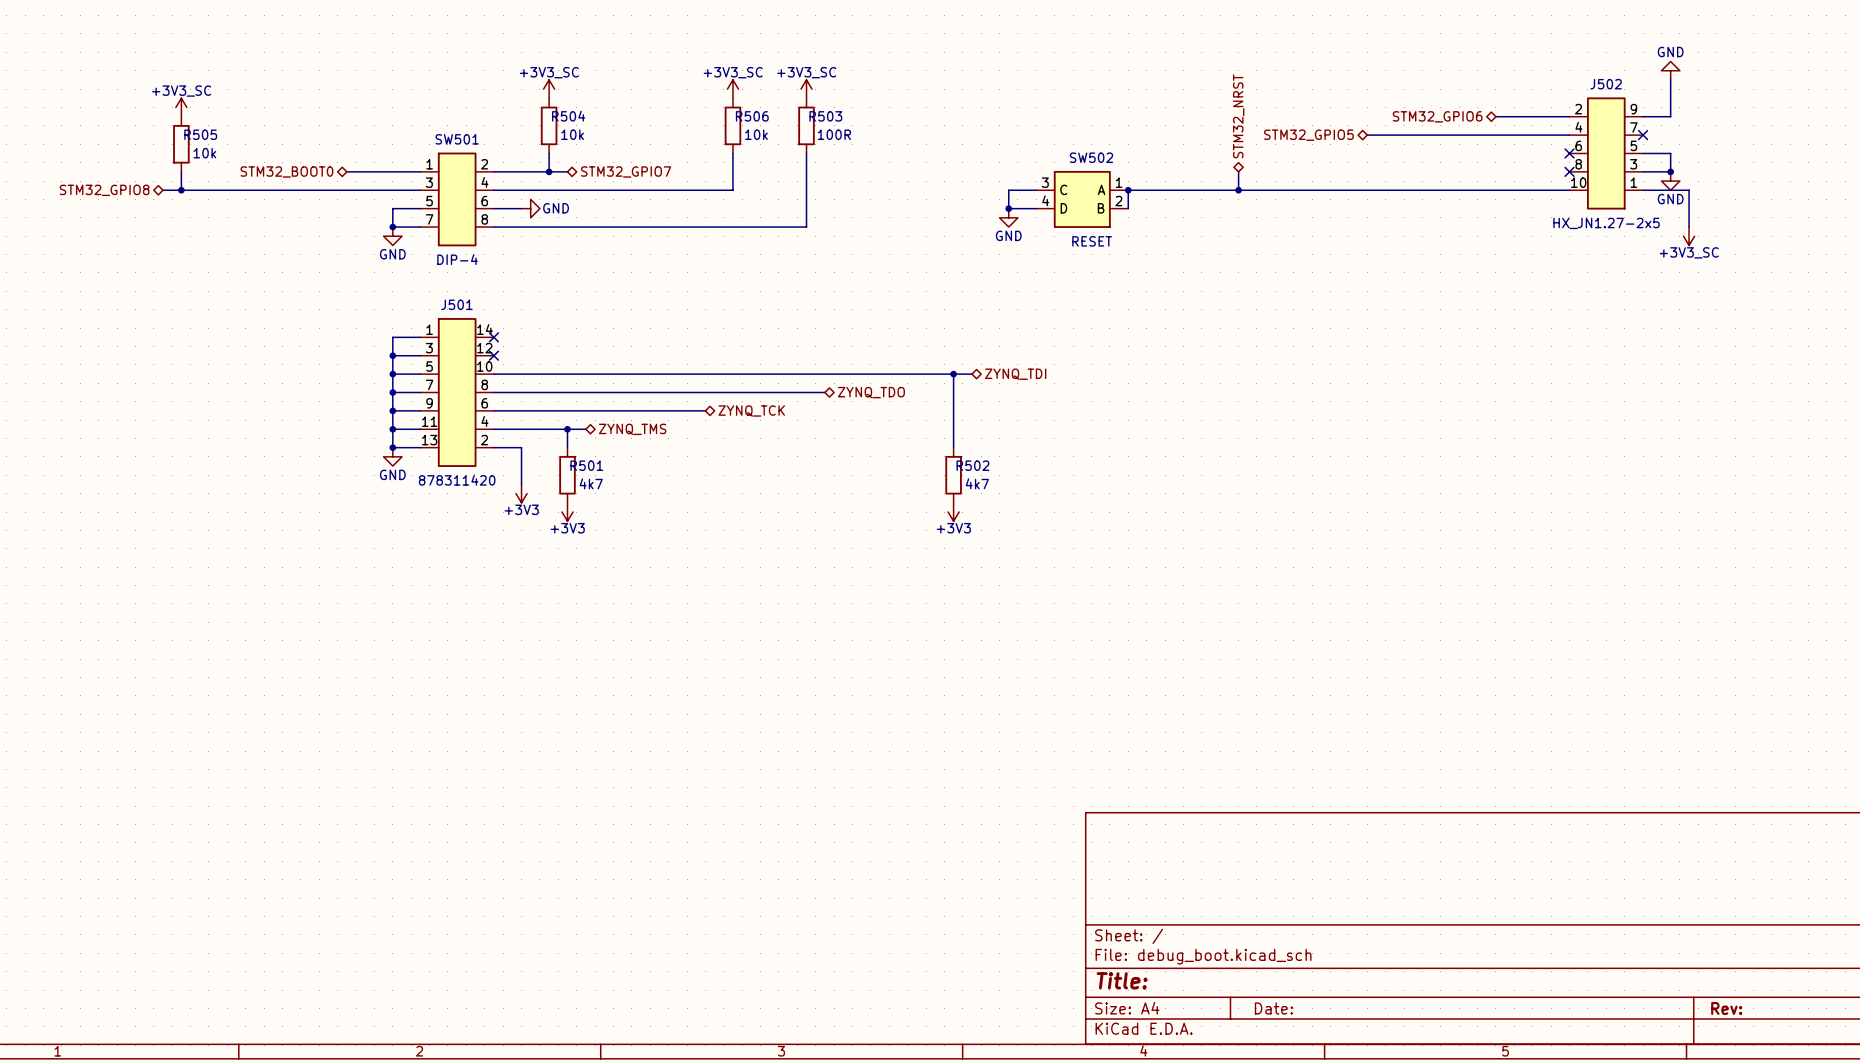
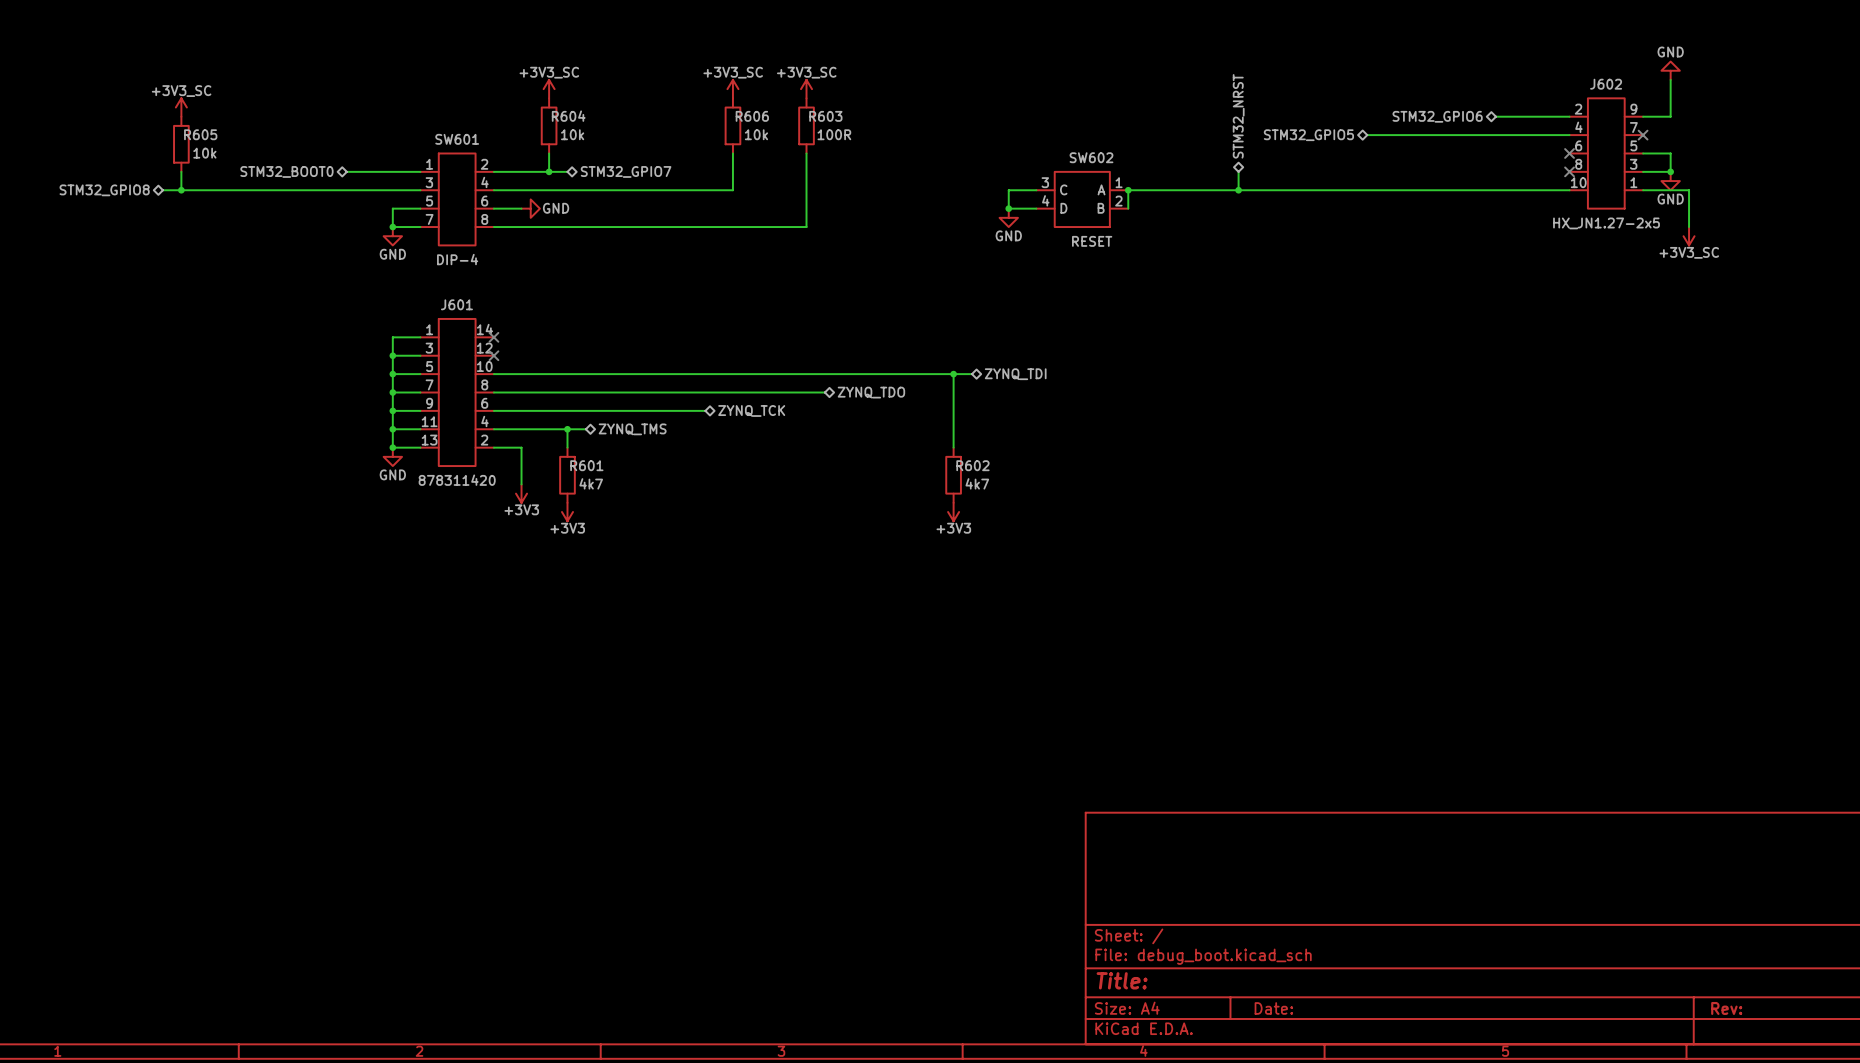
J502 name: J502 (1606, 84) -> J602 (1606, 84)
R504 name: R504 (568, 116) -> R604 (568, 116)
R506 name: R506 (752, 116) -> R606 (752, 116)
R503 name: R503 (825, 116) -> R603 (825, 116)
R505 name: R505 (200, 134) -> R605 (200, 134)
SW501 name: SW501 (457, 139) -> SW601 (457, 139)
SW502 name: SW502 (1091, 157) -> SW602 (1091, 157)
J501 name: J501 (456, 304) -> J601 (456, 304)
R501 name: R501 (586, 465) -> R601 (586, 465)
R502 name: R502 (972, 465) -> R602 (972, 465)

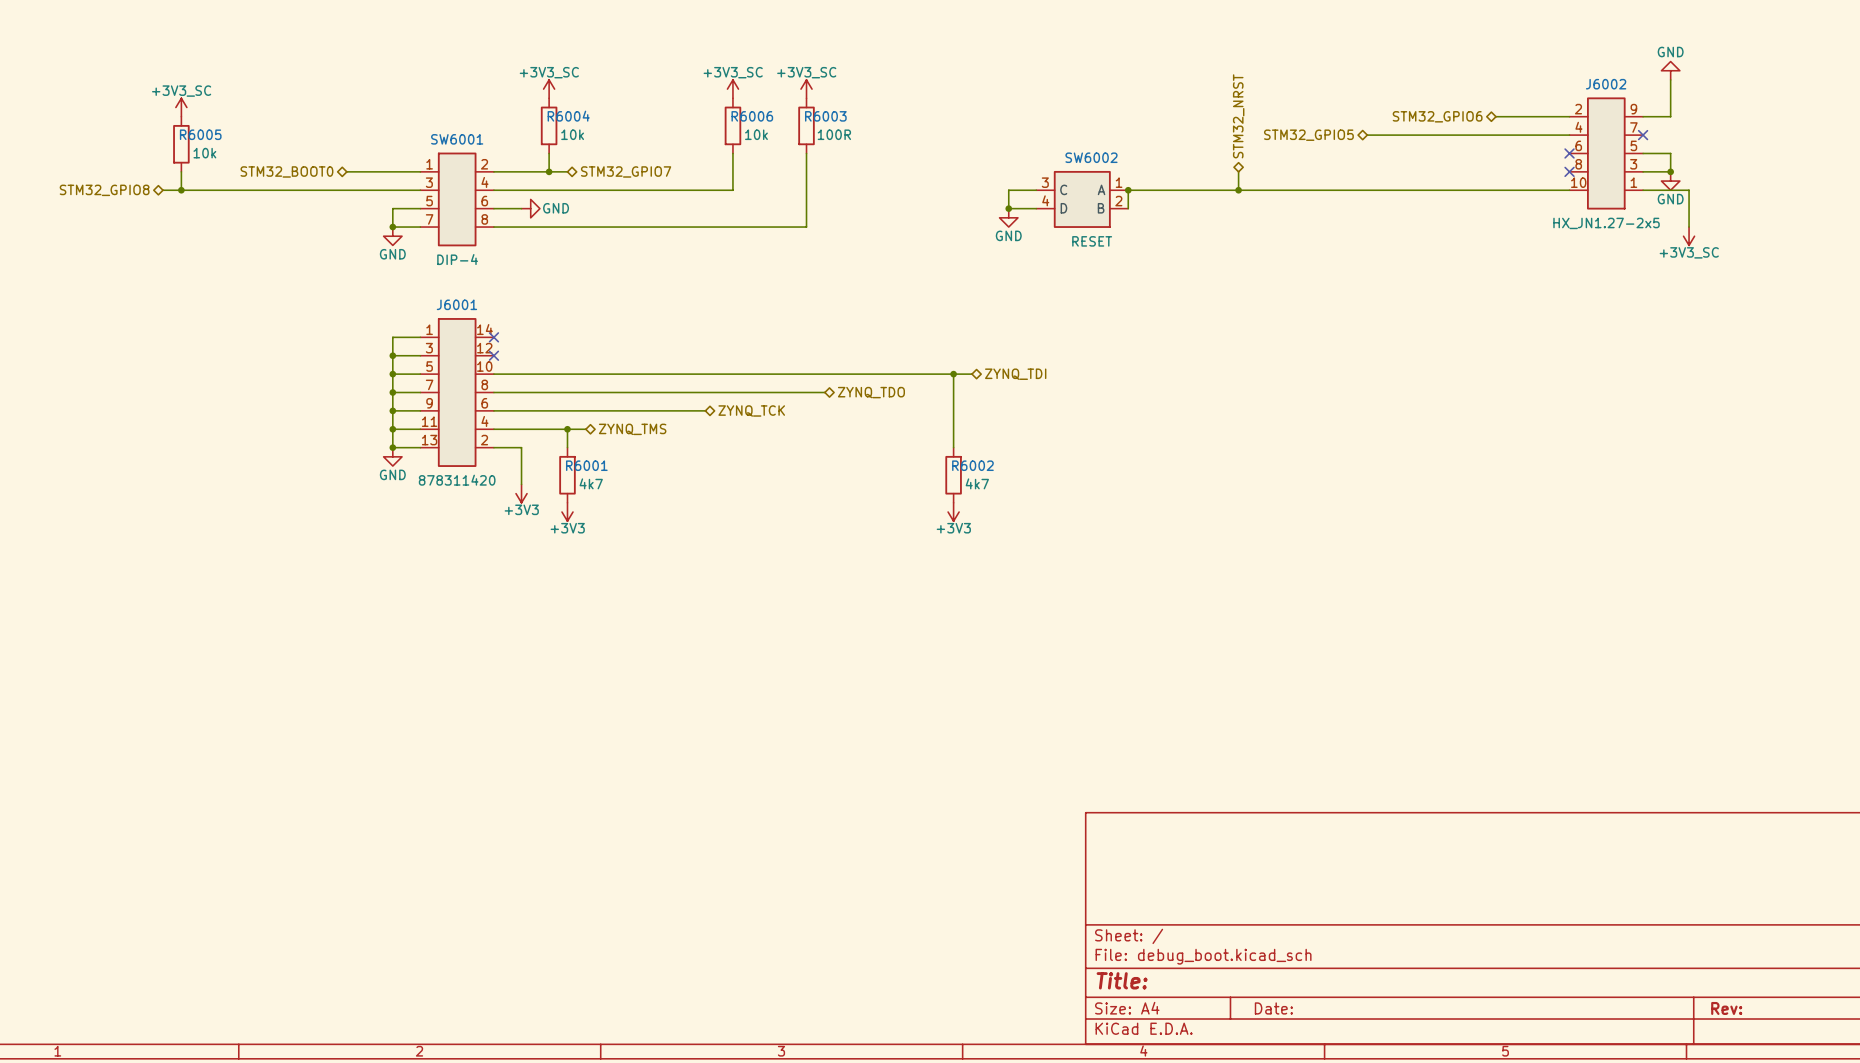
J602 name: J602 (1606, 84) -> J6002 (1606, 84)
R604 name: R604 (568, 116) -> R6004 (568, 116)
R606 name: R606 (752, 116) -> R6006 (752, 116)
R603 name: R603 (825, 116) -> R6003 (825, 116)
R605 name: R605 (200, 134) -> R6005 (200, 134)
SW601 name: SW601 (457, 139) -> SW6001 (457, 139)
SW602 name: SW602 (1091, 157) -> SW6002 (1091, 157)
J601 name: J601 (456, 304) -> J6001 (456, 304)
R601 name: R601 (586, 465) -> R6001 (586, 465)
R602 name: R602 (972, 465) -> R6002 (972, 465)

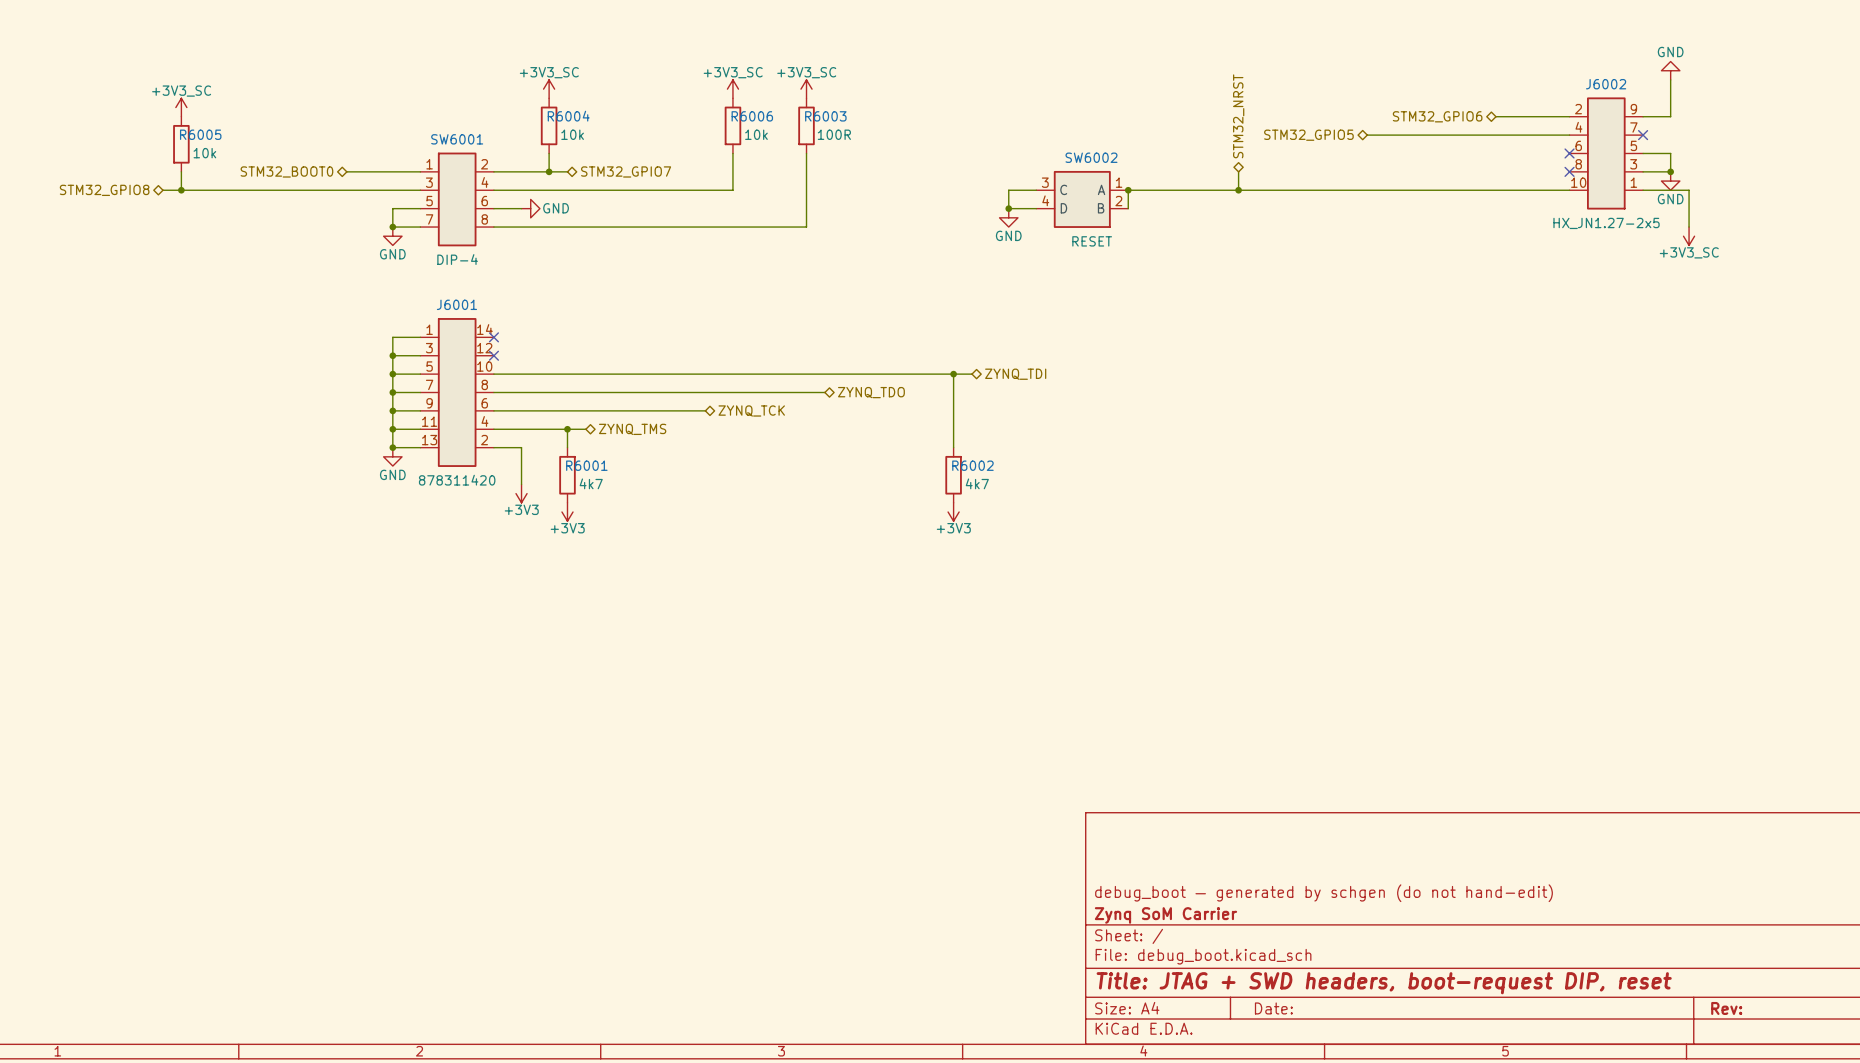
title block: none -> debug_boot — generated by schgen (do not hand-edit) (1324, 893)
title block: none -> Zynq SoM Carrier (1165, 915)
title block: Title: (1122, 980) -> Title: JTAG + SWD headers, boot-request DIP, reset (1384, 983)

